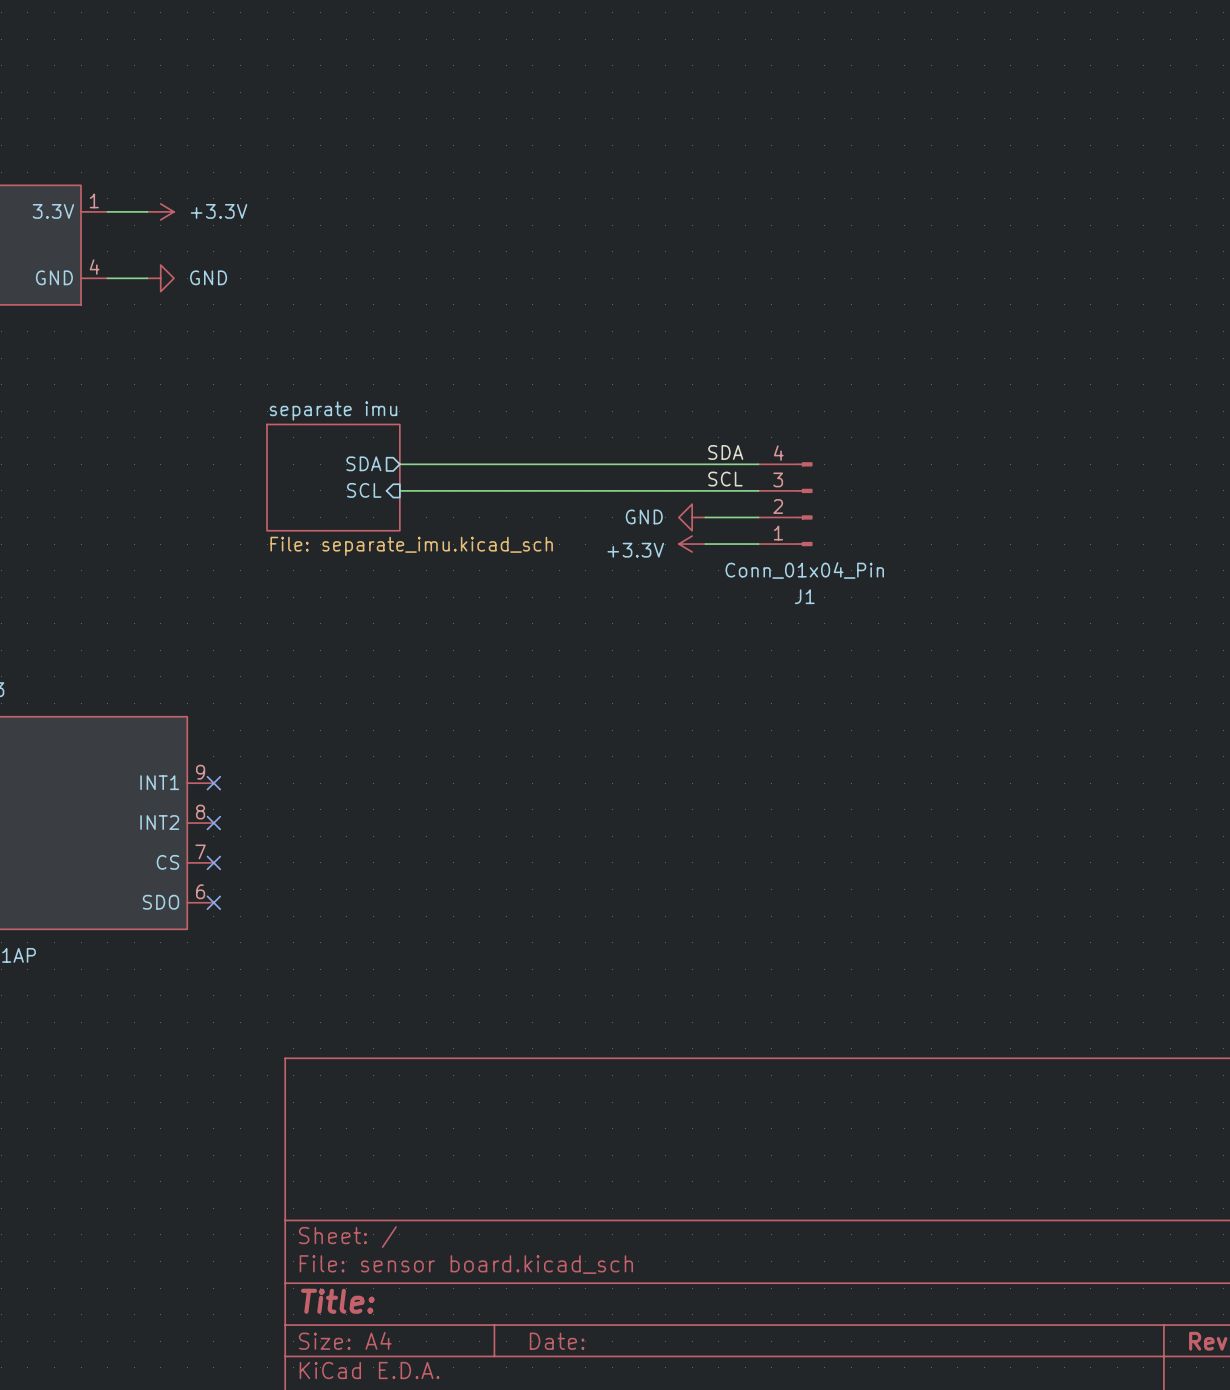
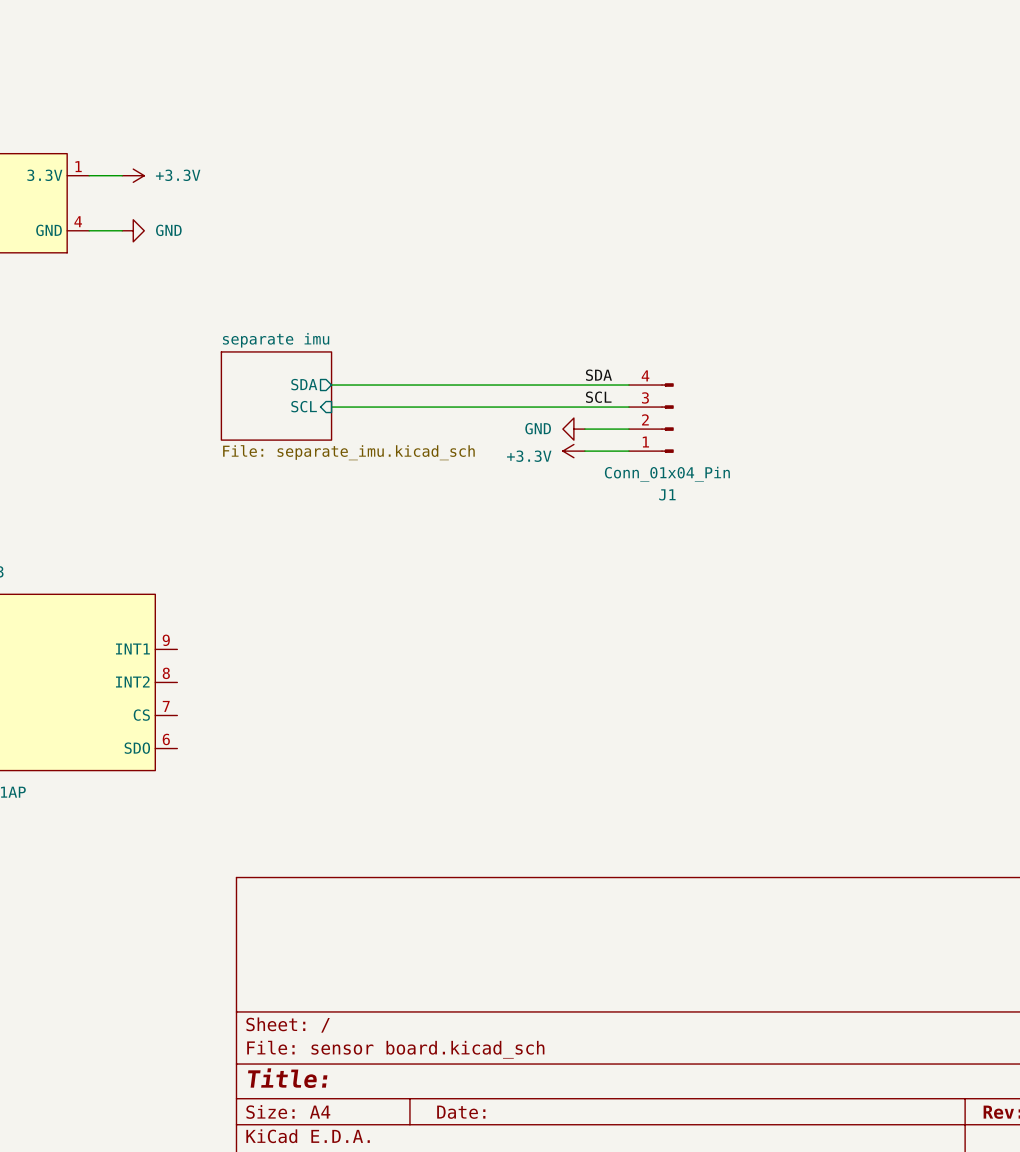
no-connect mark: (213, 783) -> none
no-connect mark: (213, 823) -> none
no-connect mark: (213, 862) -> none
no-connect mark: (213, 902) -> none

